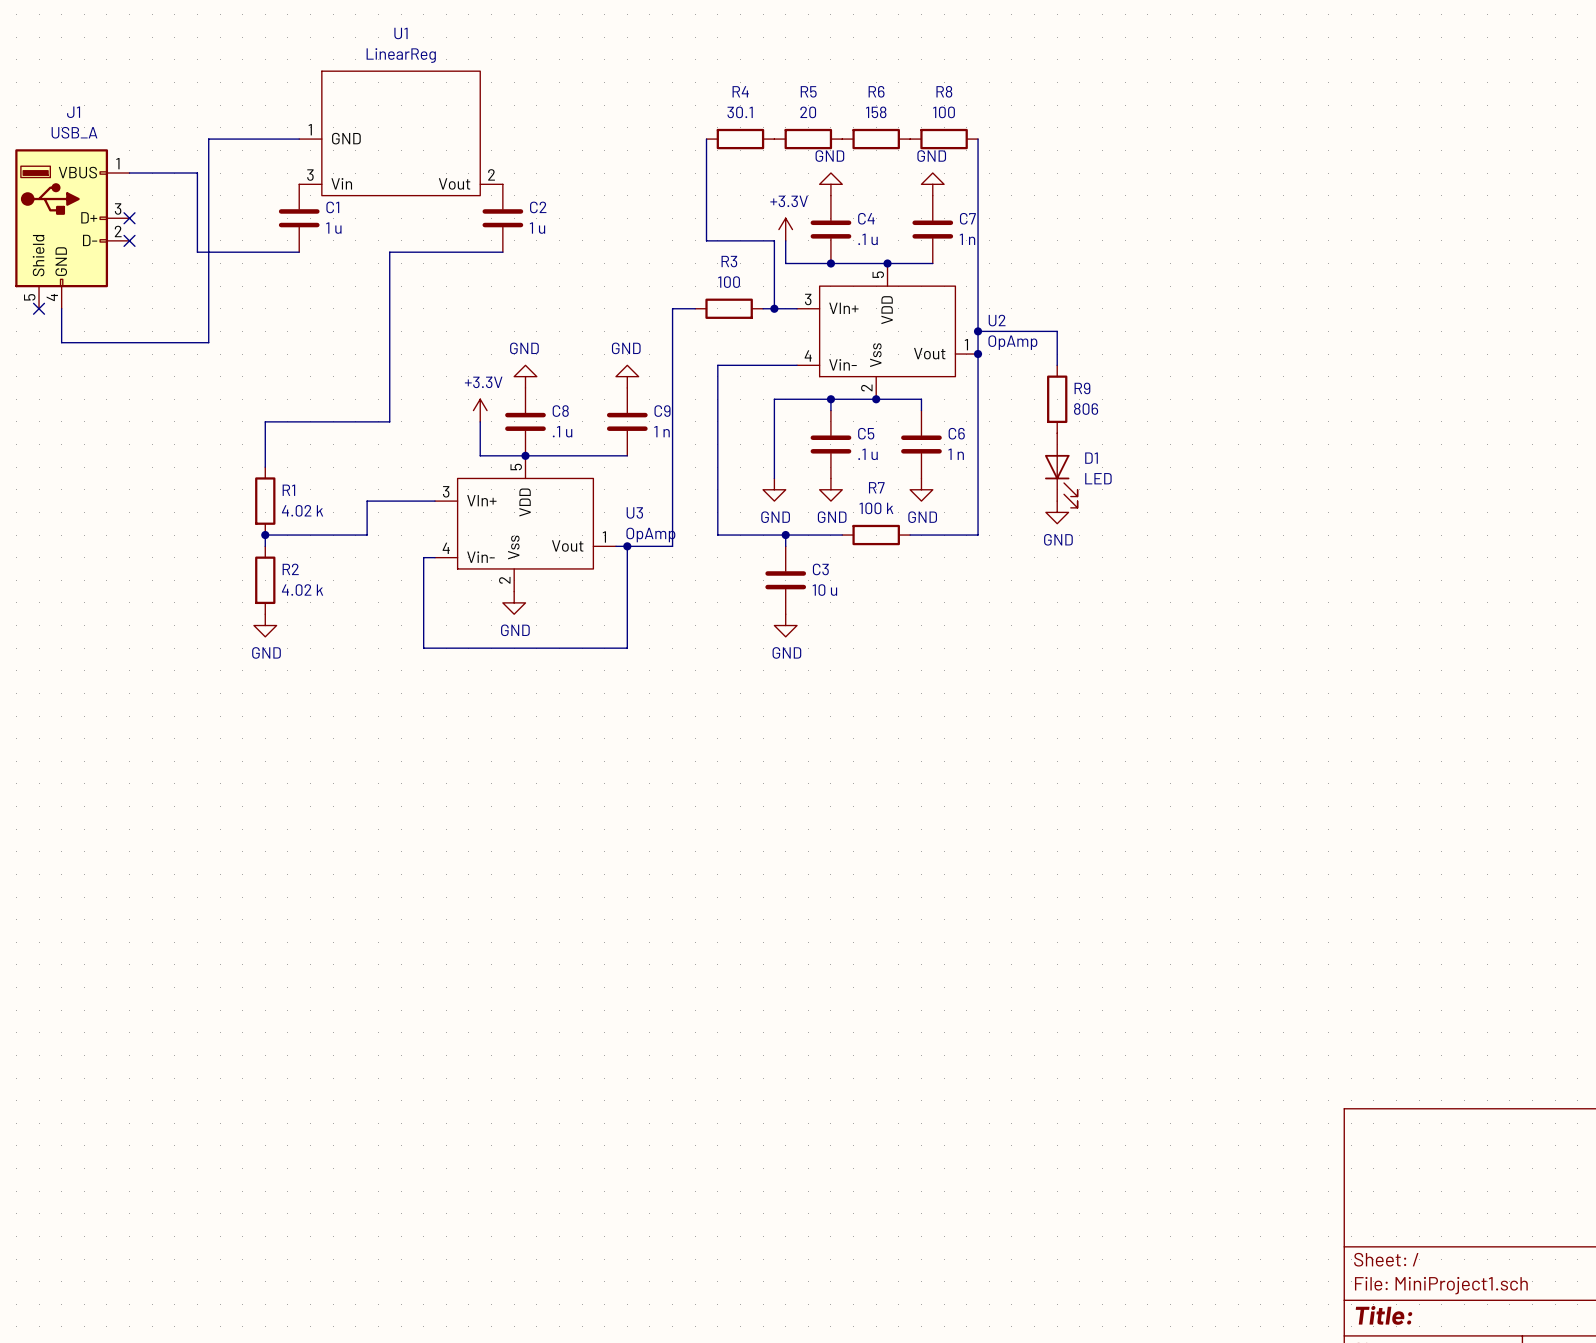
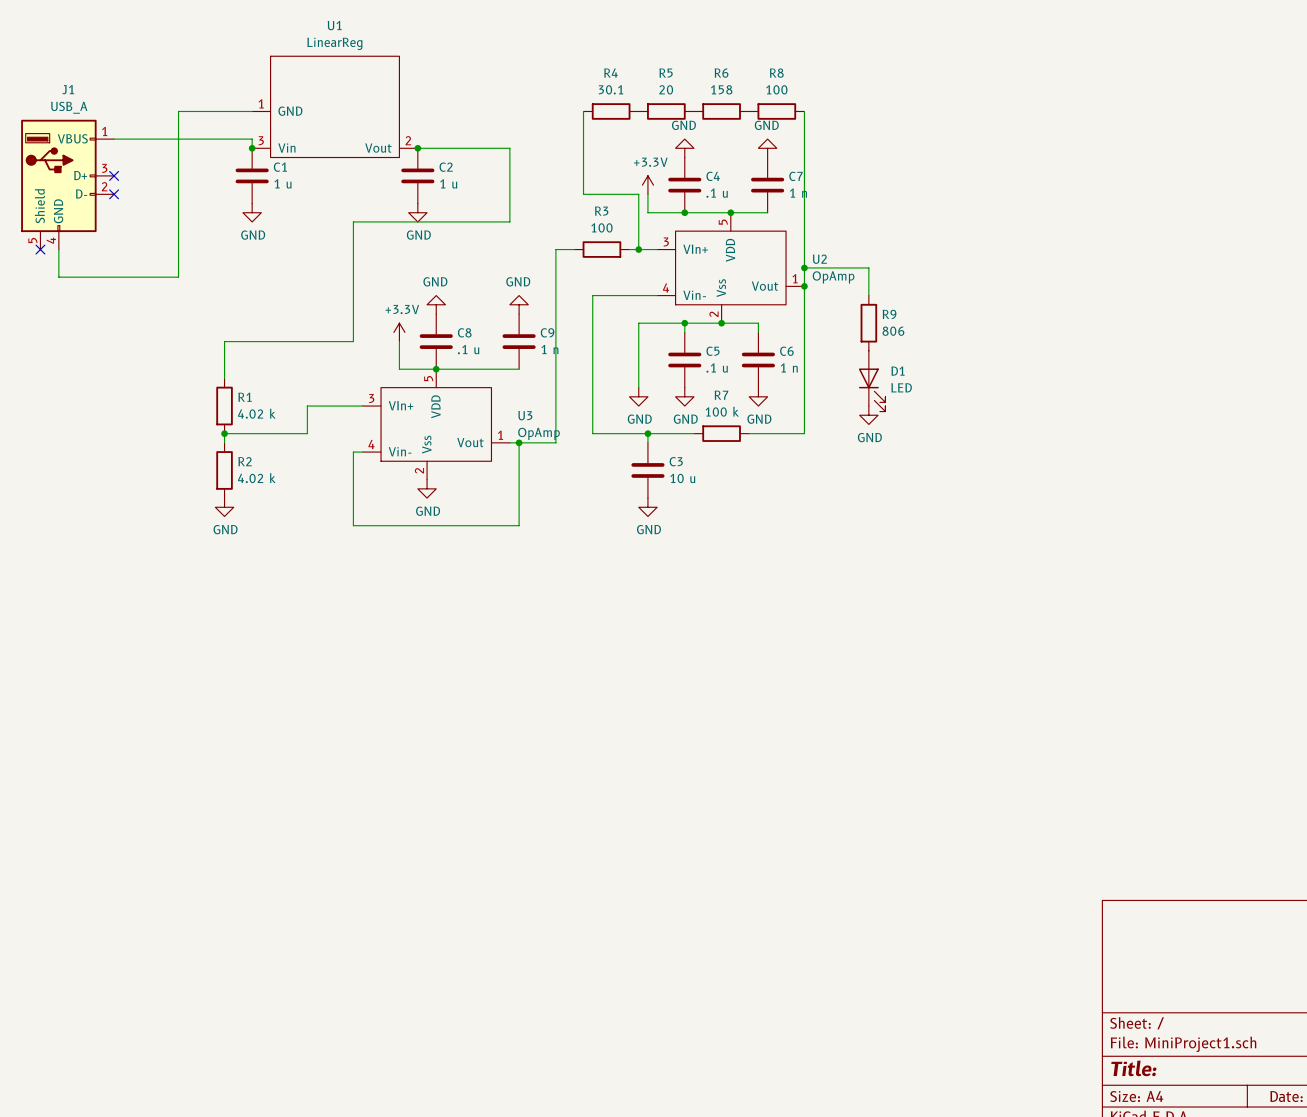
wire: (197, 173) (197, 252) (299, 252) -> (169, 139) (252, 139) (252, 148)
junction: none -> (252, 148)
junction: none -> (417, 148)
wire: (502, 252) (389, 252) (389, 421) -> (417, 148) (509, 148) (509, 221) (353, 221) (353, 341) (325, 341)
power symbol: none -> GND (252, 212)
power symbol: none -> GND (417, 212)

